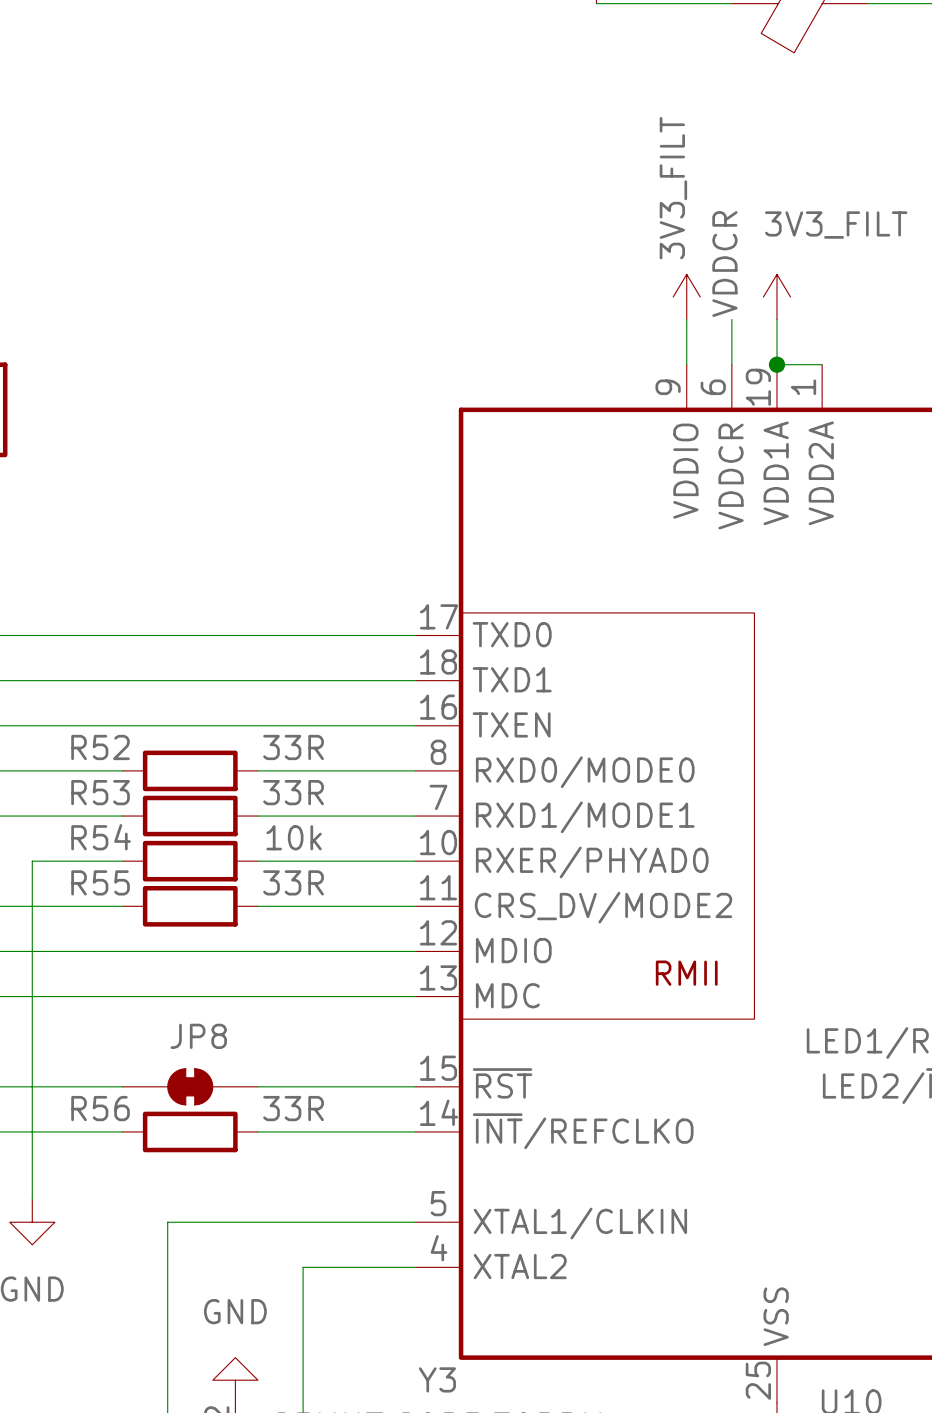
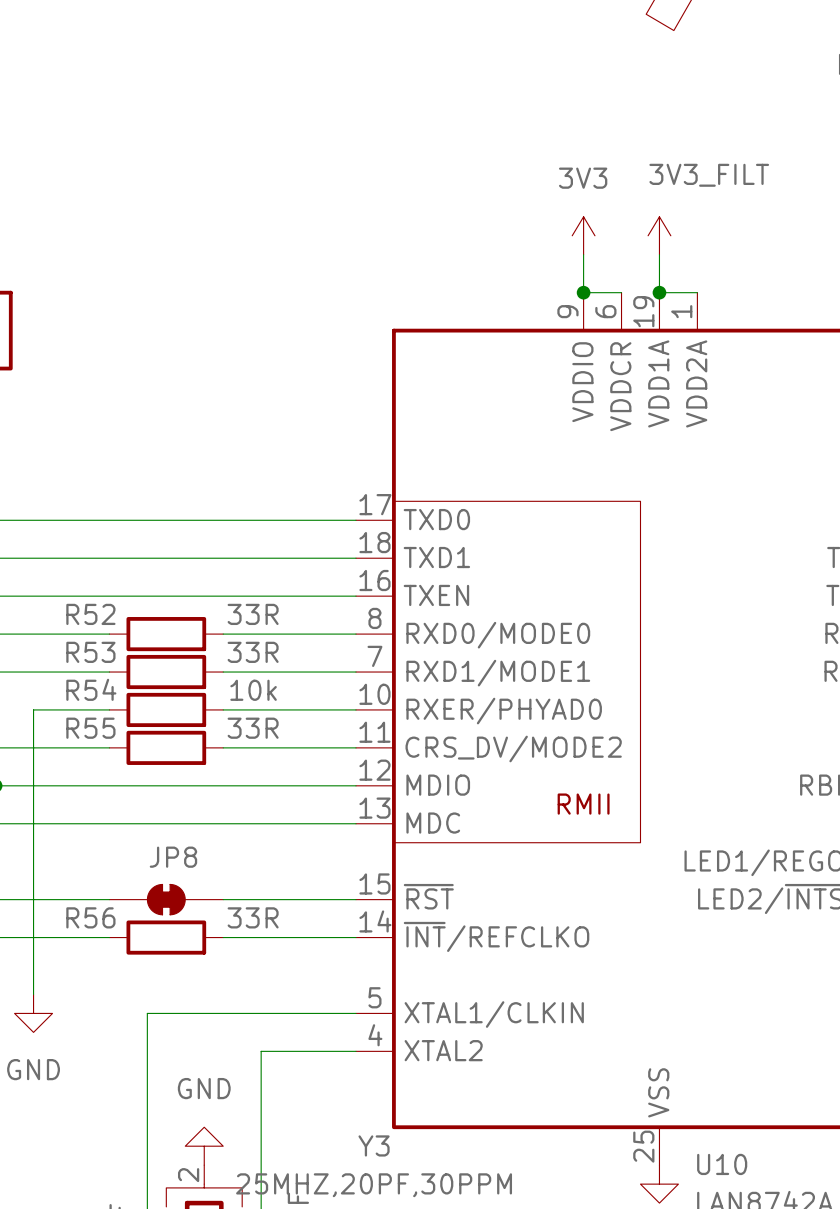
label: VDDCR (724, 264) -> none
power symbol: 3V3_FILT (686, 297) -> 3V3 (583, 235)
wire: (731, 319) (731, 364) -> (583, 292) (621, 292)
junction: none -> (583, 292)

